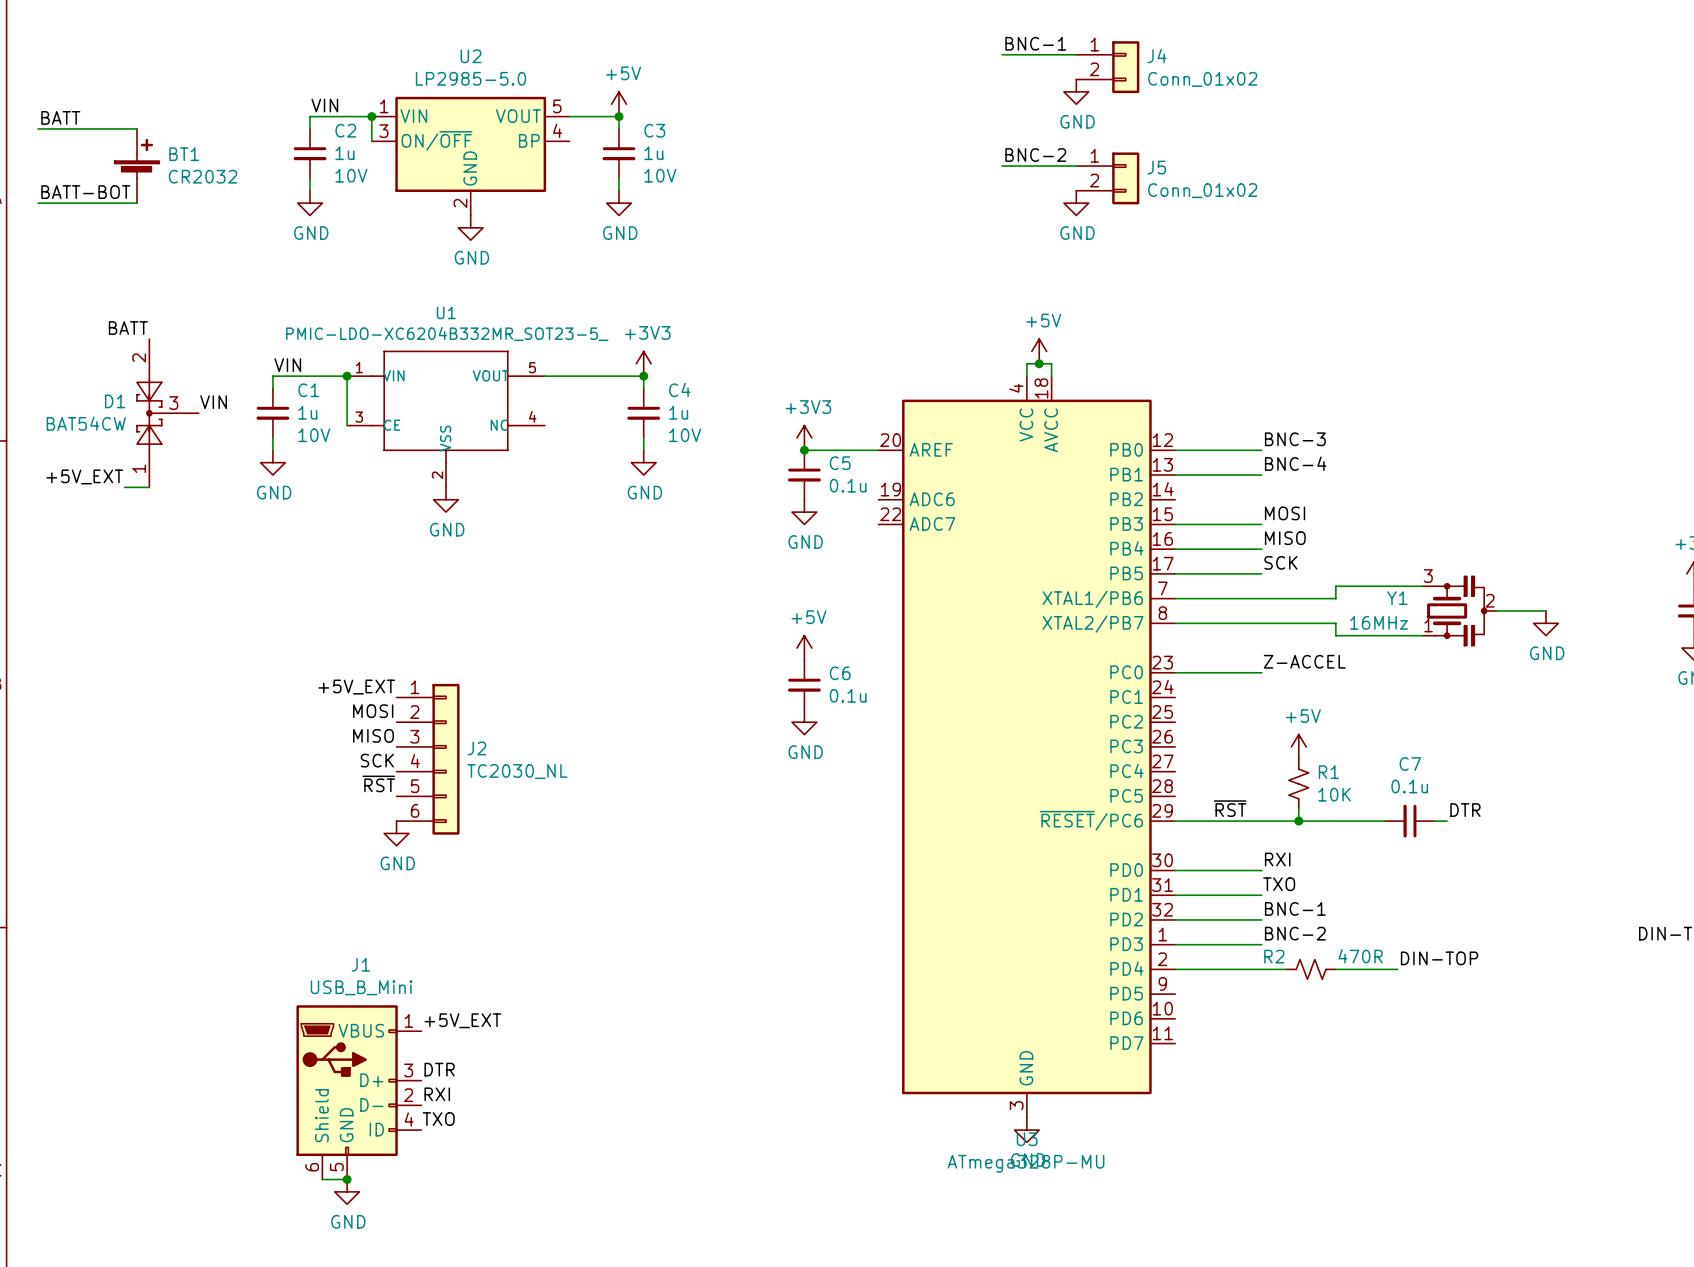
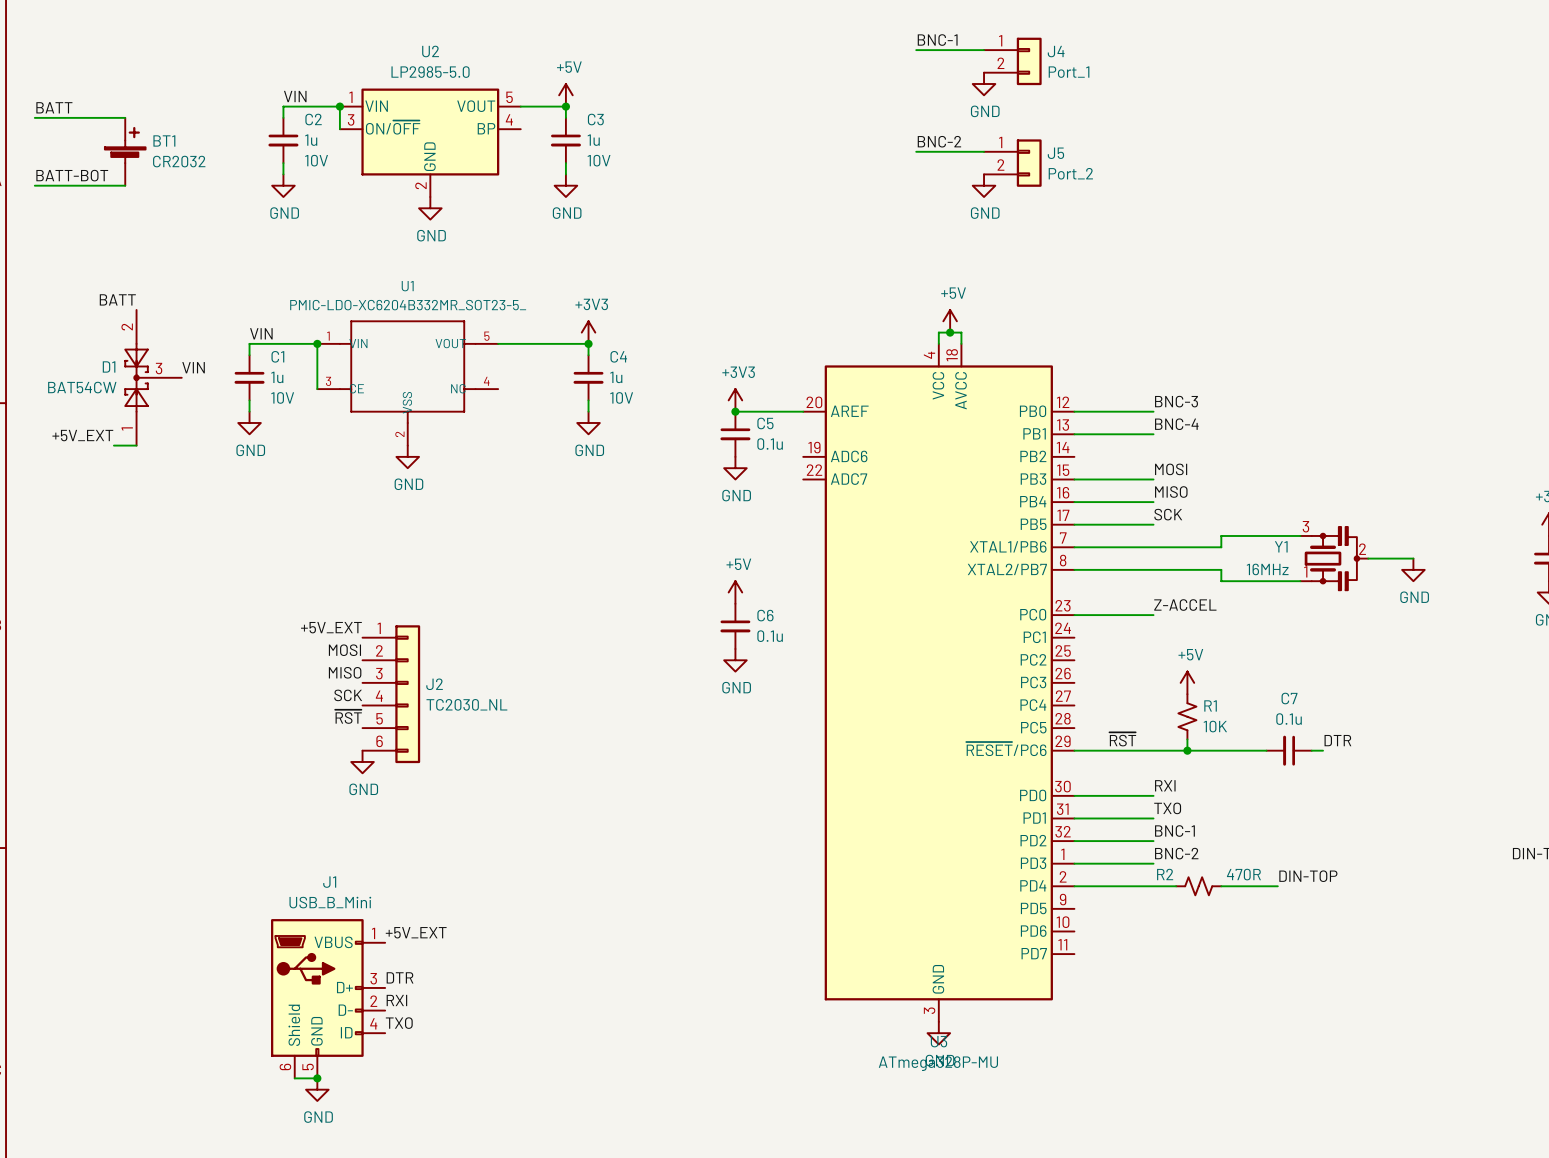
J4 value: Conn_01x02 (1202, 79) -> Port_1 (1069, 72)
J5 value: Conn_01x02 (1202, 190) -> Port_2 (1070, 173)

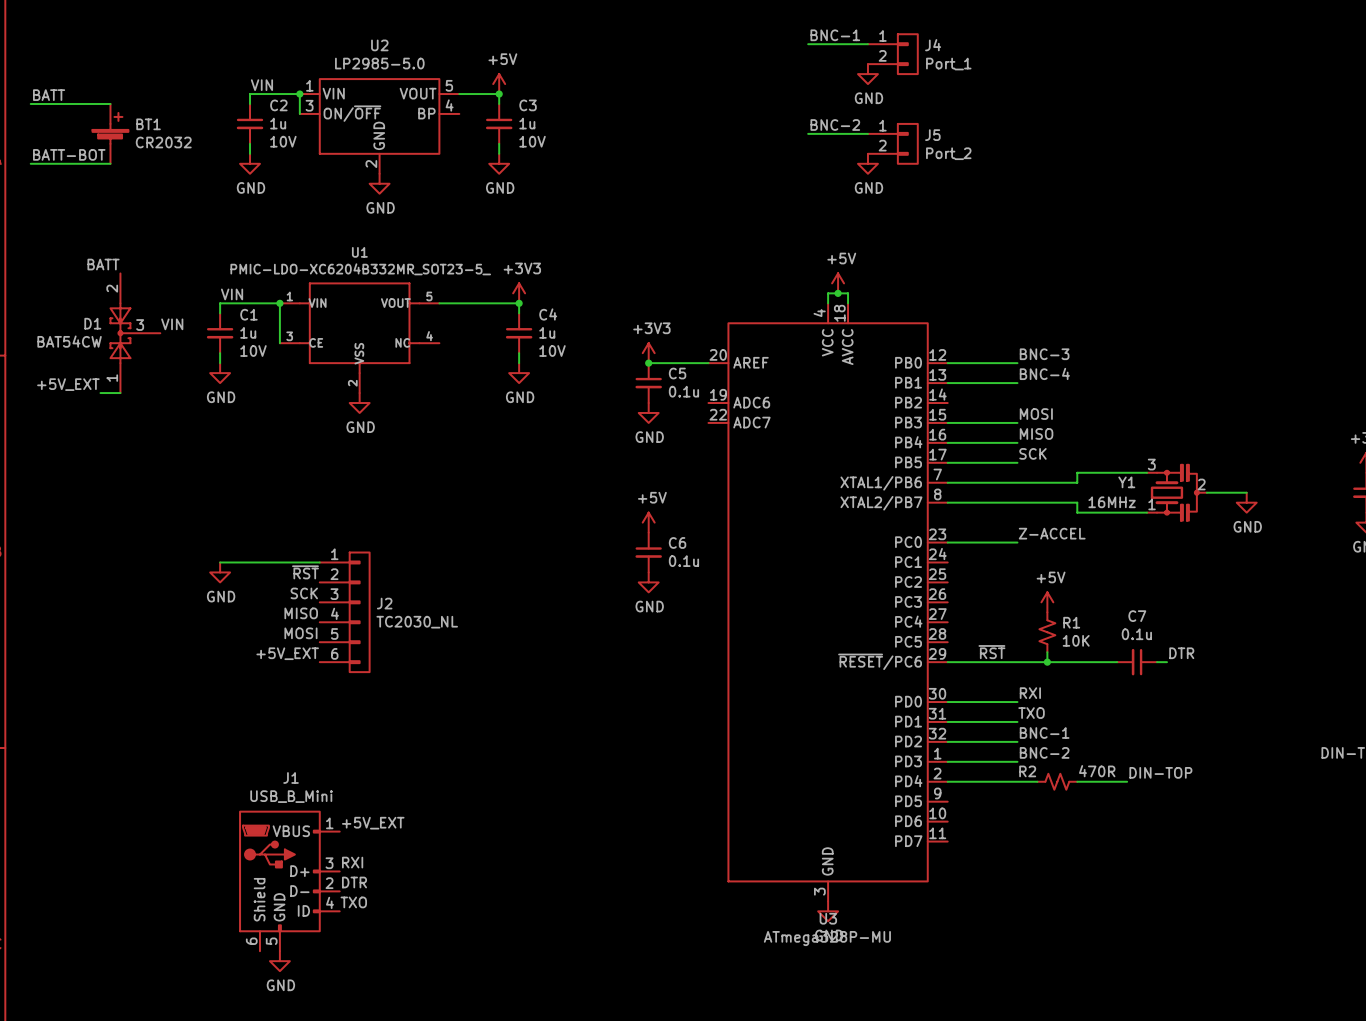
label position: +5V_EXT (331, 627) -> +5V_EXT (287, 653)
wire: none -> (220, 562) (319, 562)
label: MOSI (344, 650) -> ~{RST} (305, 572)
label: MISO (345, 672) -> SCK (304, 593)
label: SCK (348, 695) -> MISO (301, 613)
label: ~{RST} (348, 716) -> MOSI (300, 633)
power symbol position: GND (362, 761) -> GND (220, 572)
label: DTR (400, 977) -> RXI (352, 862)
label: RXI (396, 1000) -> DTR (354, 882)
wire: (294, 1078) (317, 1078) -> none
junction: (317, 1078) -> none

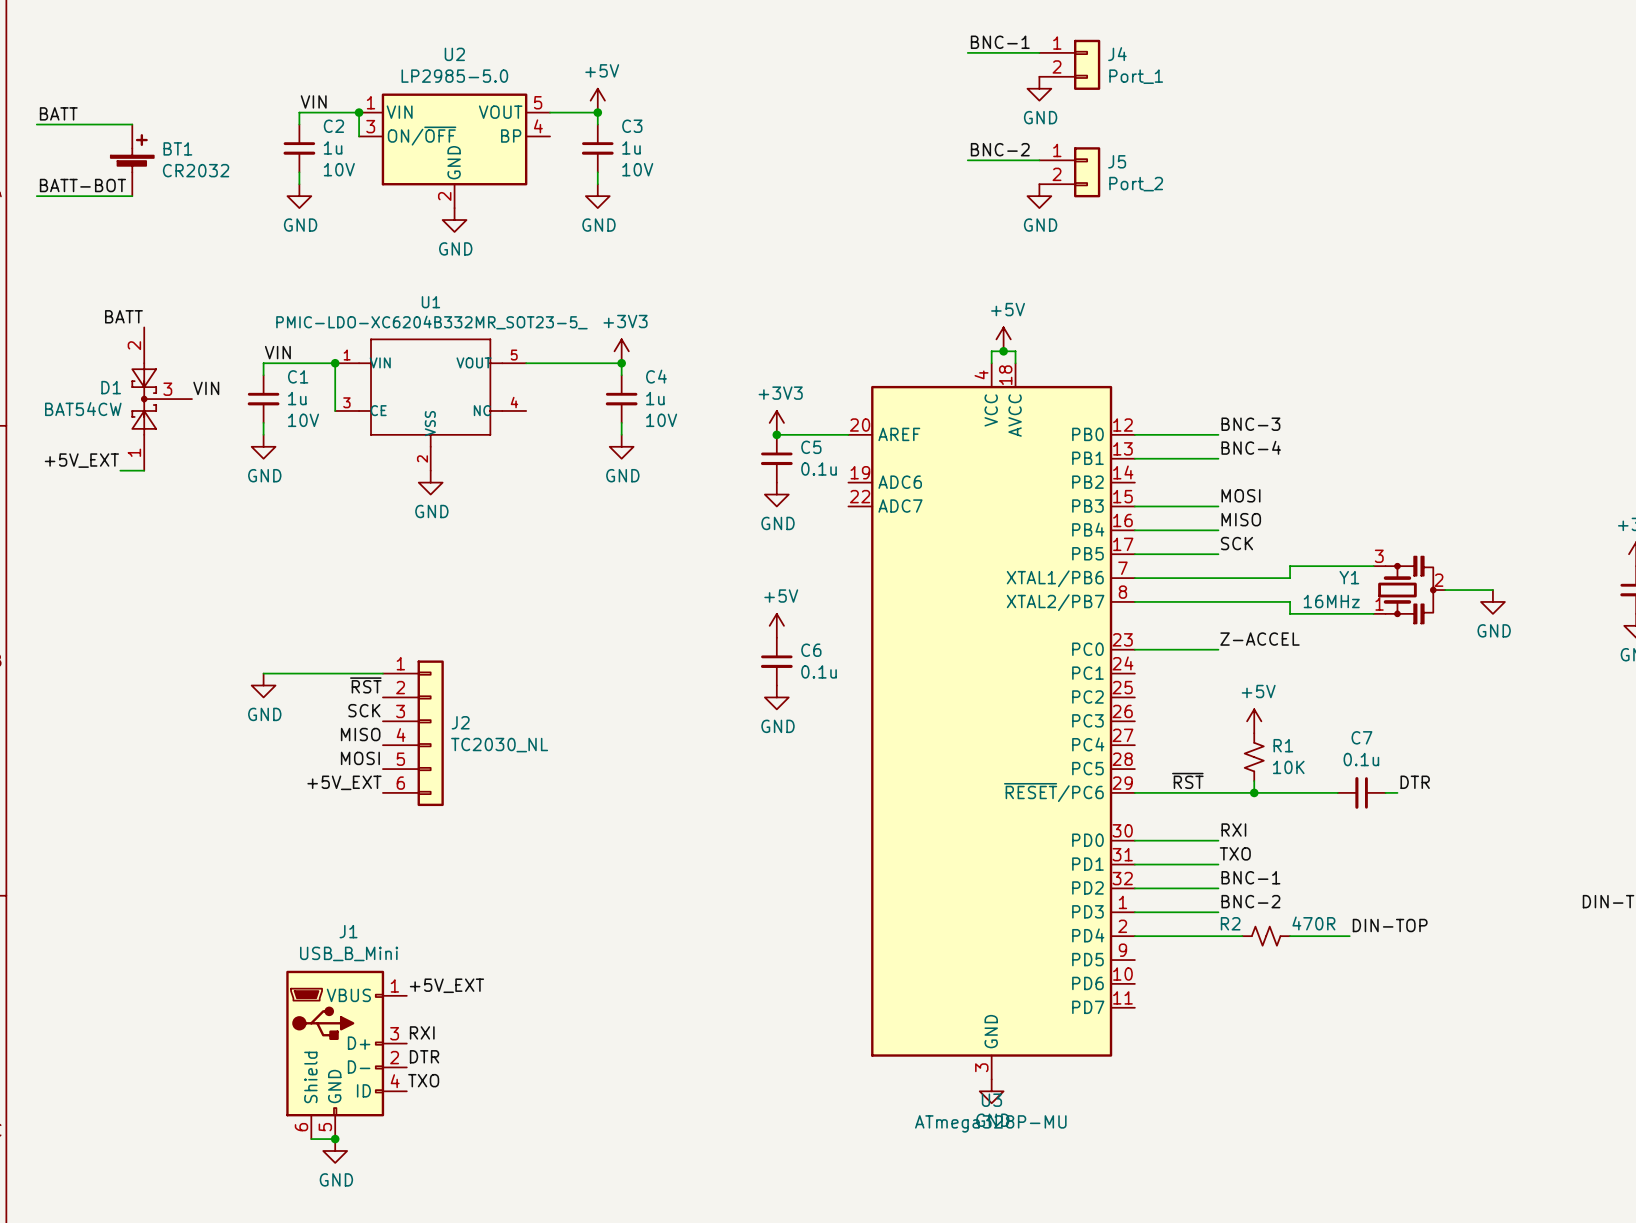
wire: none -> (311, 1139) (335, 1139)
junction: none -> (335, 1139)

